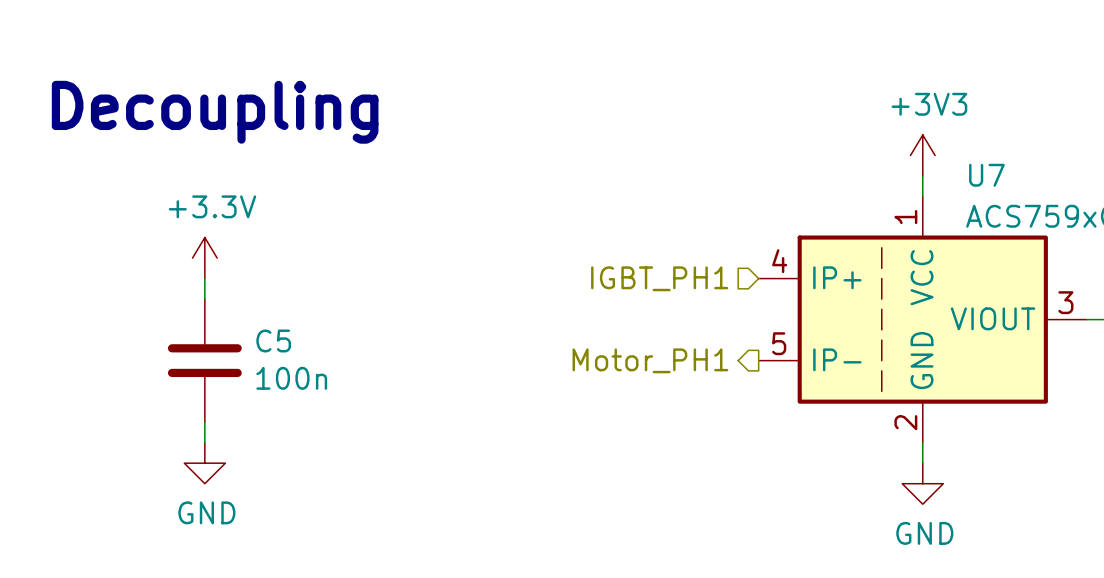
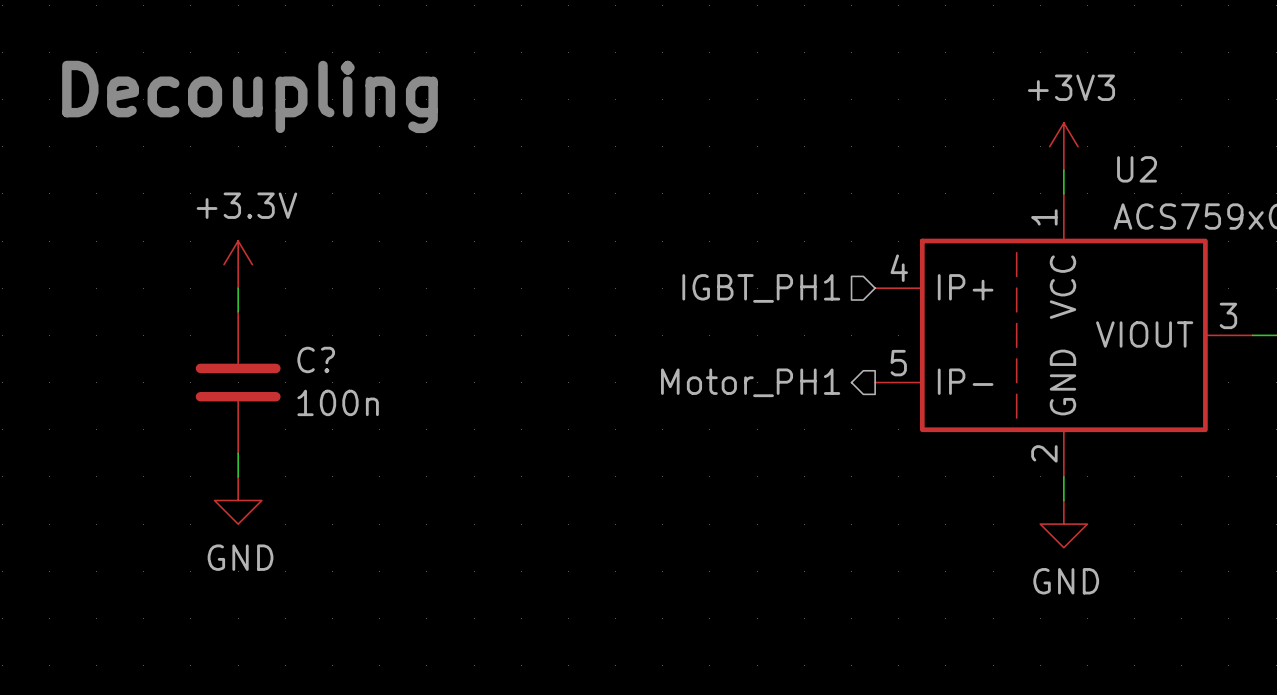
U7 name: U7 (986, 175) -> U2 (1137, 169)
C5 name: C5 (273, 340) -> C? (316, 359)

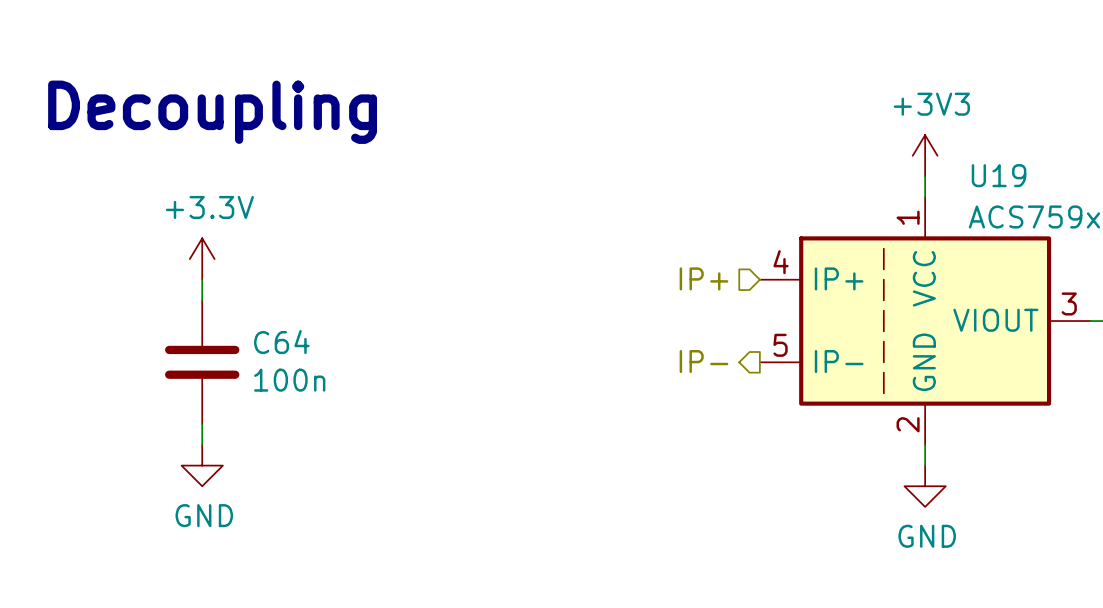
U2 name: U2 (1137, 169) -> U19 (999, 175)
hierarchical label: IGBT_PH1 (761, 288) -> IP+ (703, 278)
C? name: C? (316, 359) -> C64 (281, 342)
hierarchical label: Motor_PH1 (750, 382) -> IP- (703, 361)

